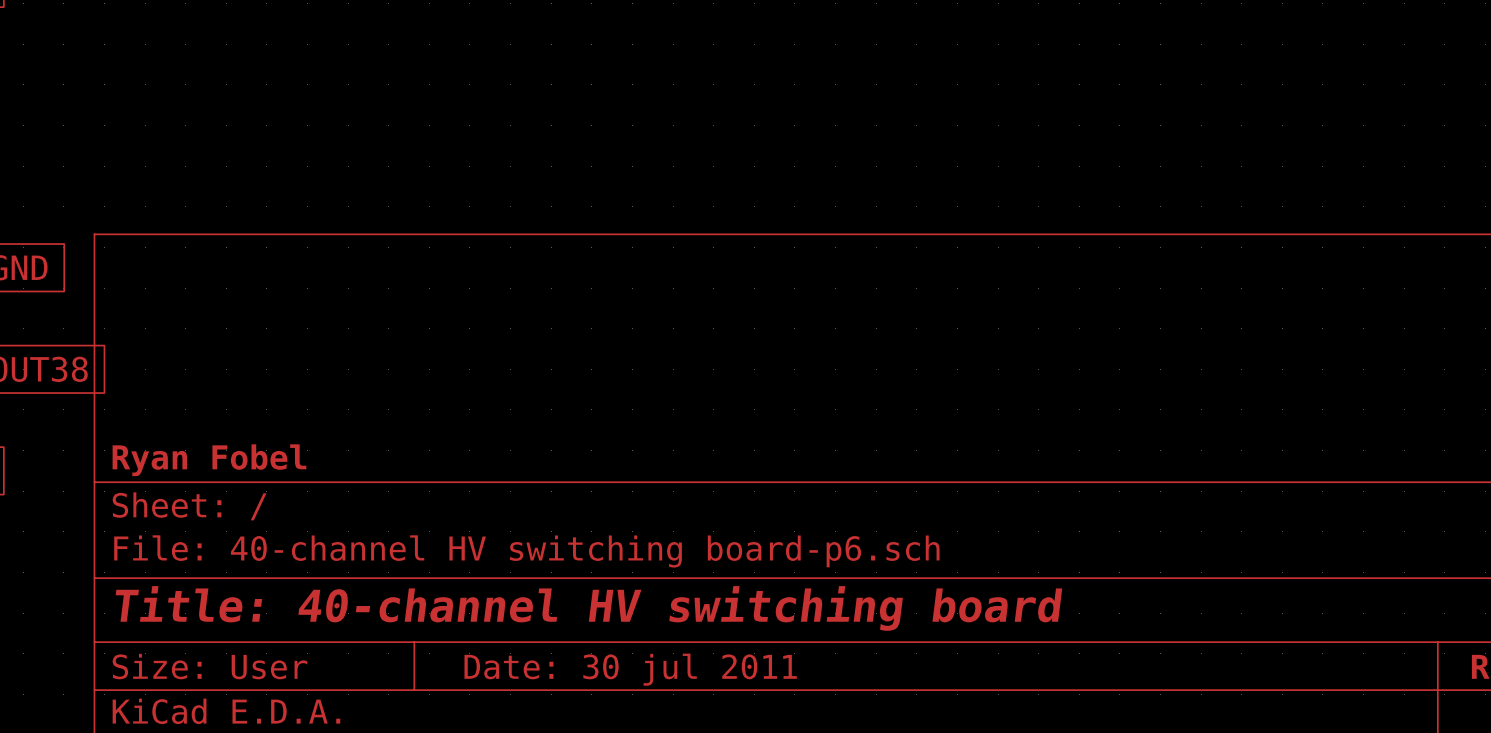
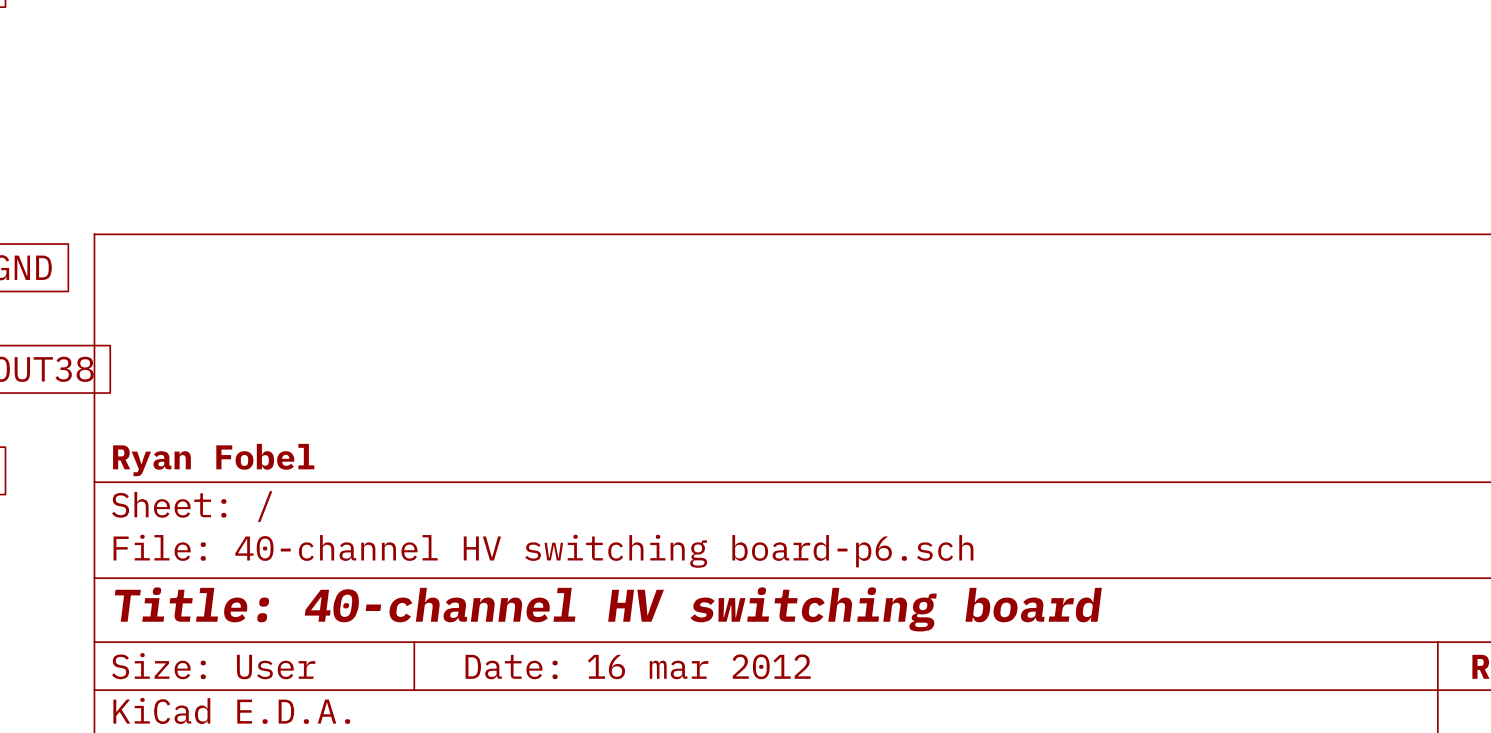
title block: Date: 30 jul 2011 (630, 669) -> Date: 16 mar 2012 (638, 666)

